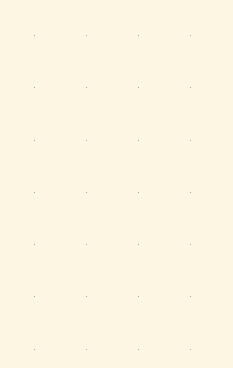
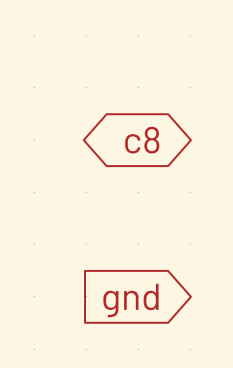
global label: none -> c8 (142, 140)
global label: none -> gnd (131, 300)

